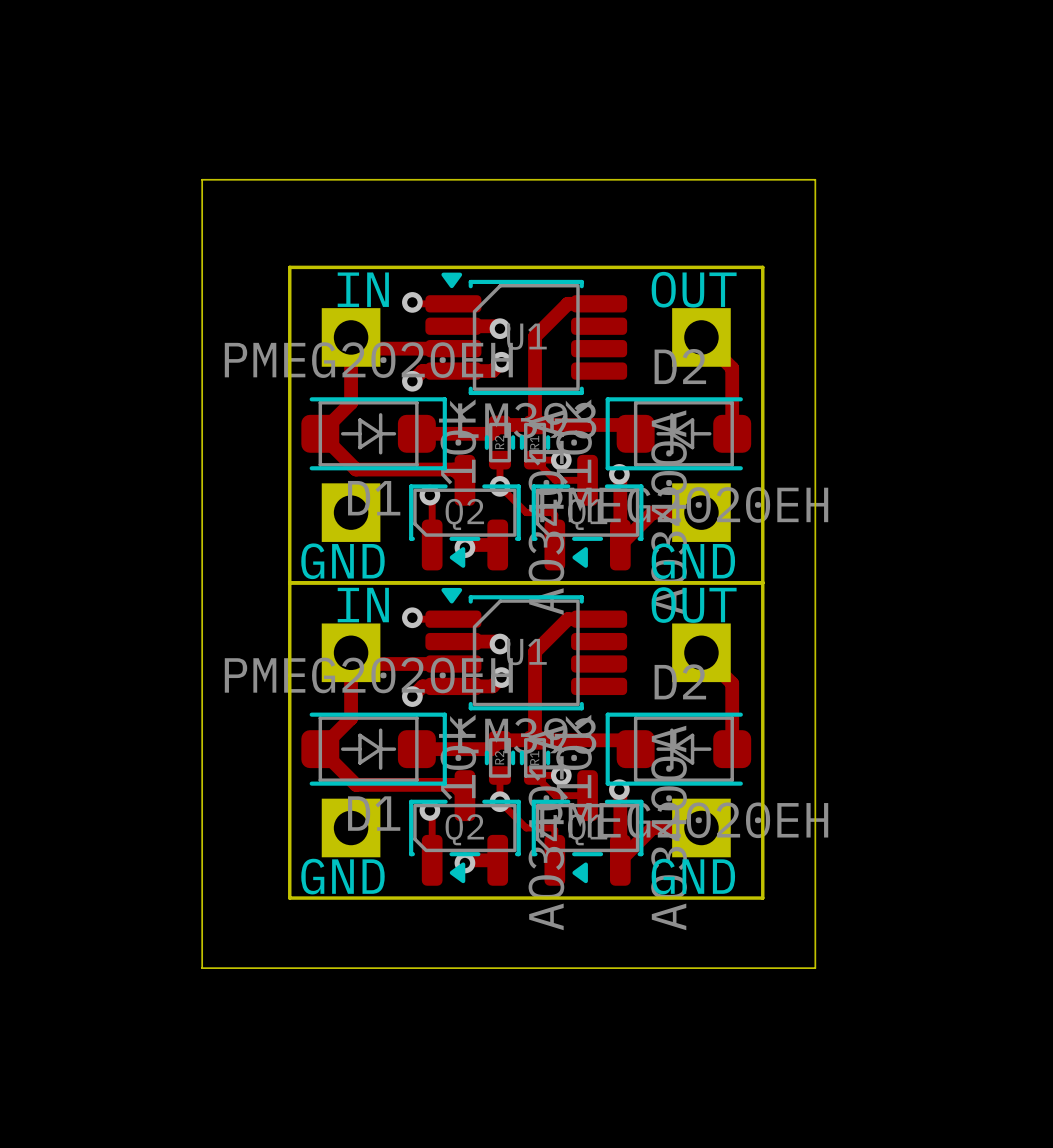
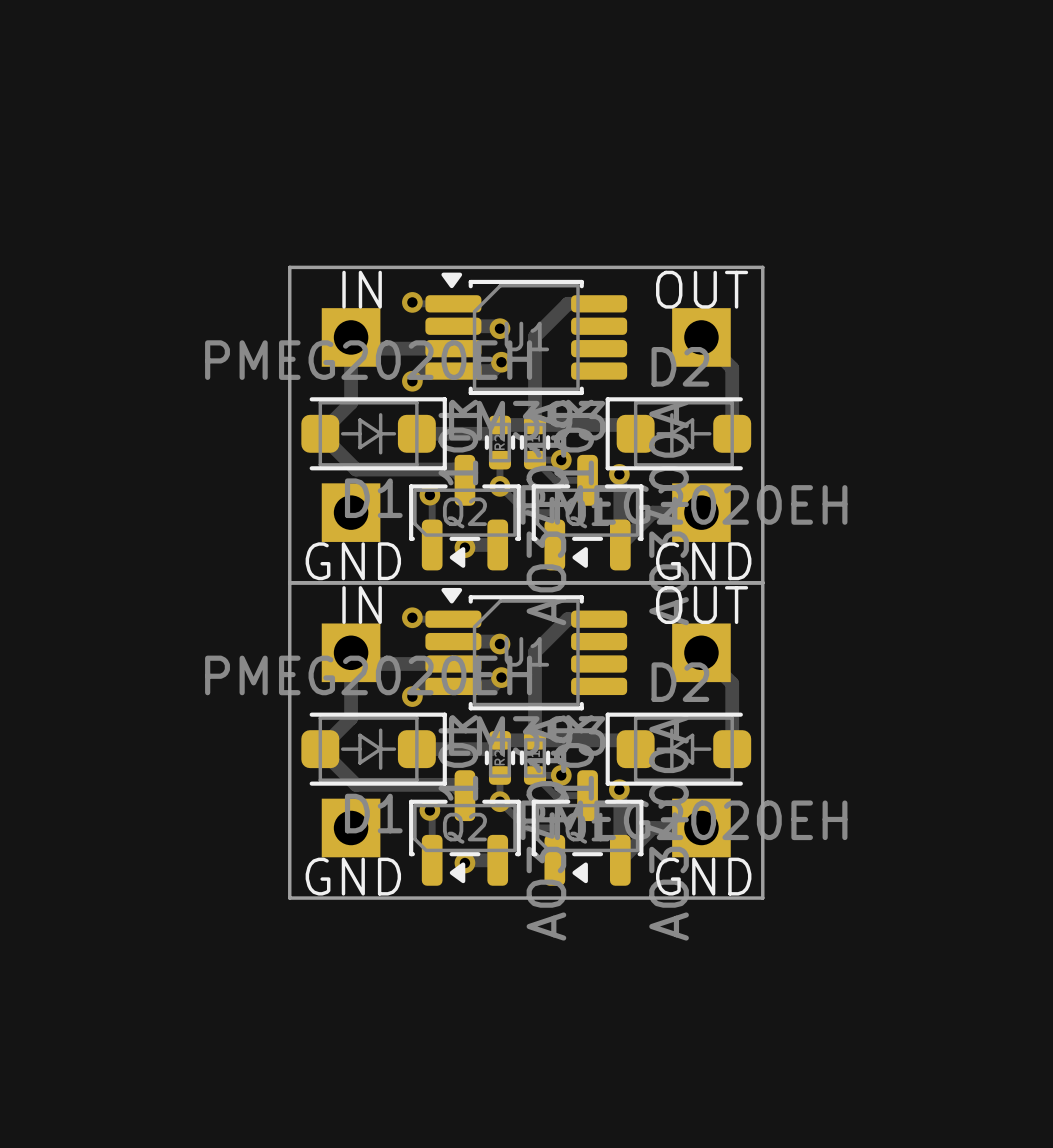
board edge: (202, 179) (815, 179) (815, 968) (202, 968) (202, 179) -> none

